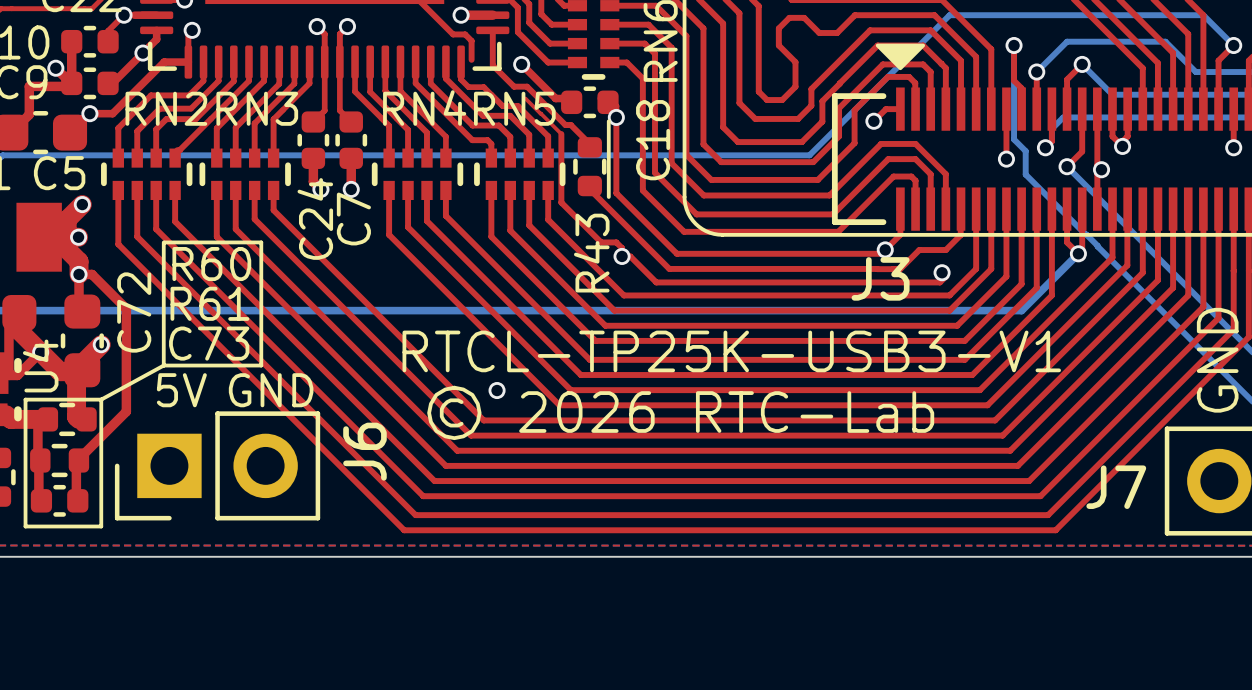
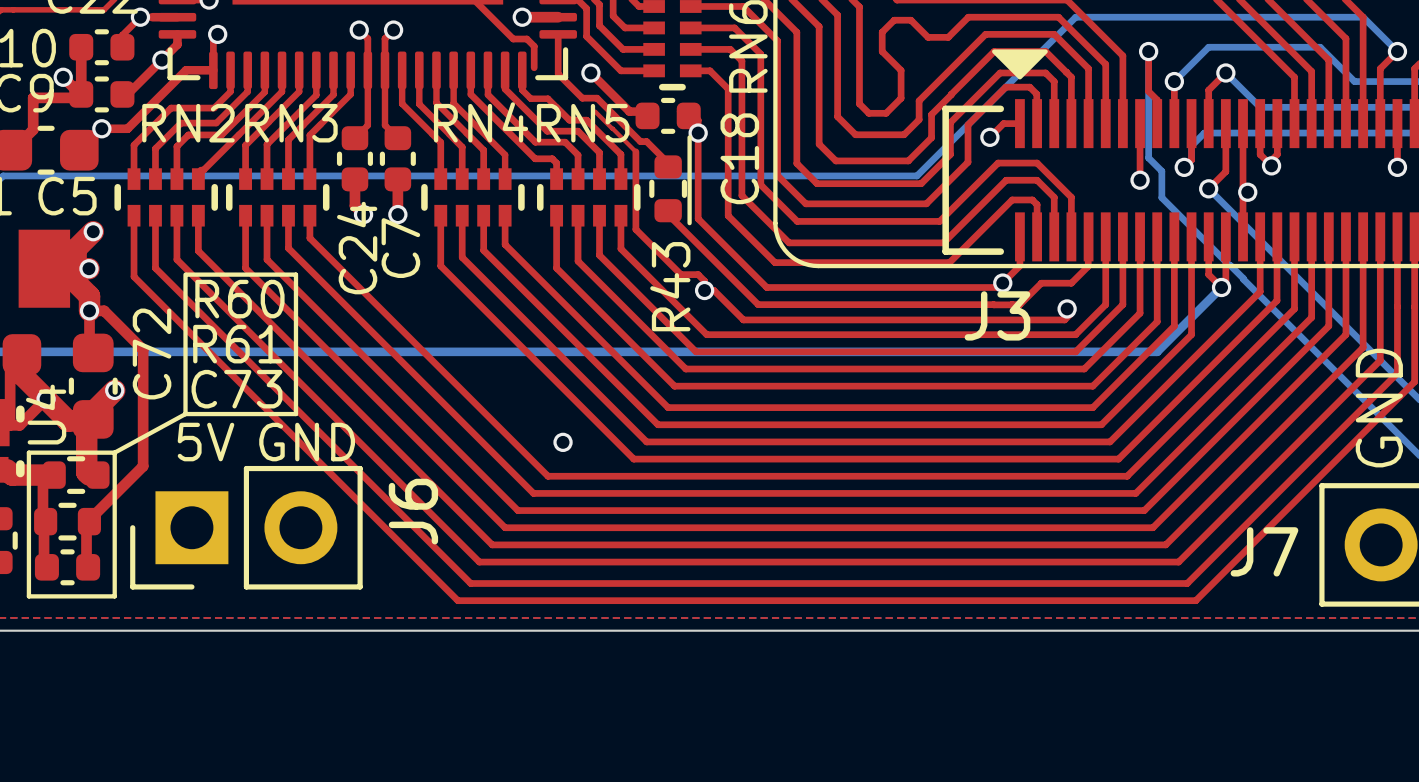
text: RTCL-TP25K-USB3-V1 (731, 351) -> none
text: © 2026 RTC-Lab (680, 412) -> none

